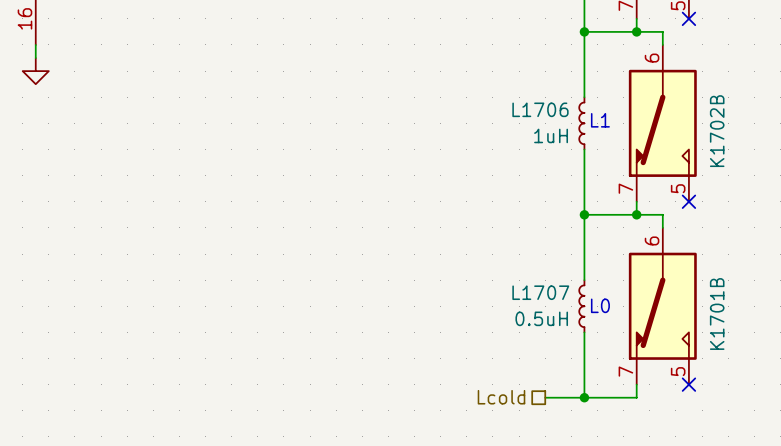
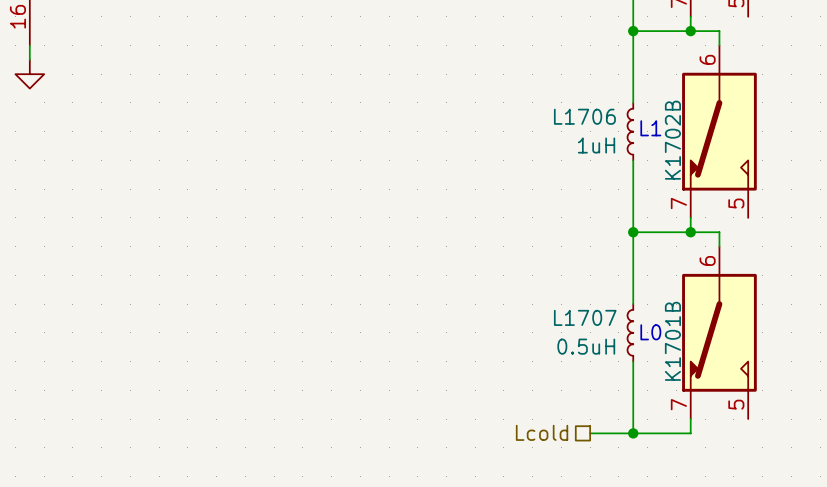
no-connect mark: (688, 18) -> none
K1702B name position: K1702B (717, 131) -> K1702B (672, 140)
no-connect mark: (688, 201) -> none
K1701B name position: K1701B (717, 314) -> K1701B (672, 341)
no-connect mark: (688, 384) -> none

